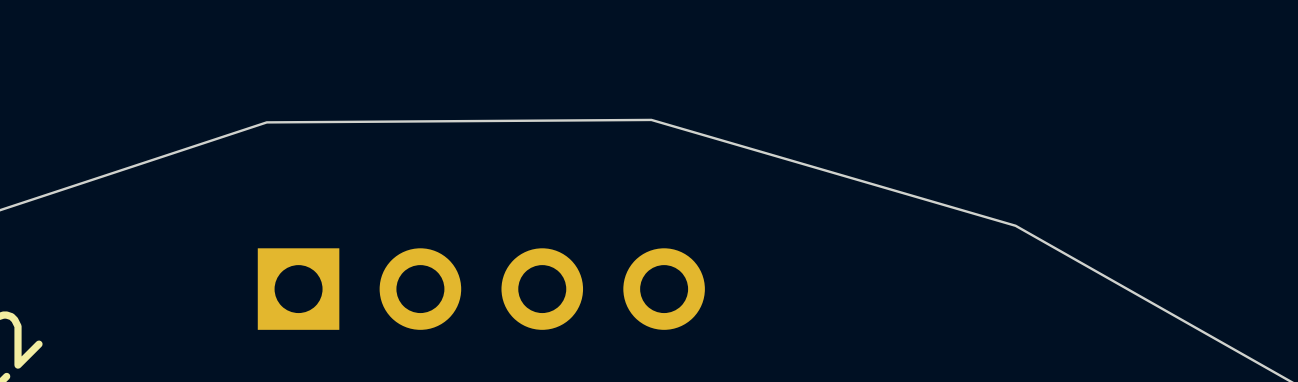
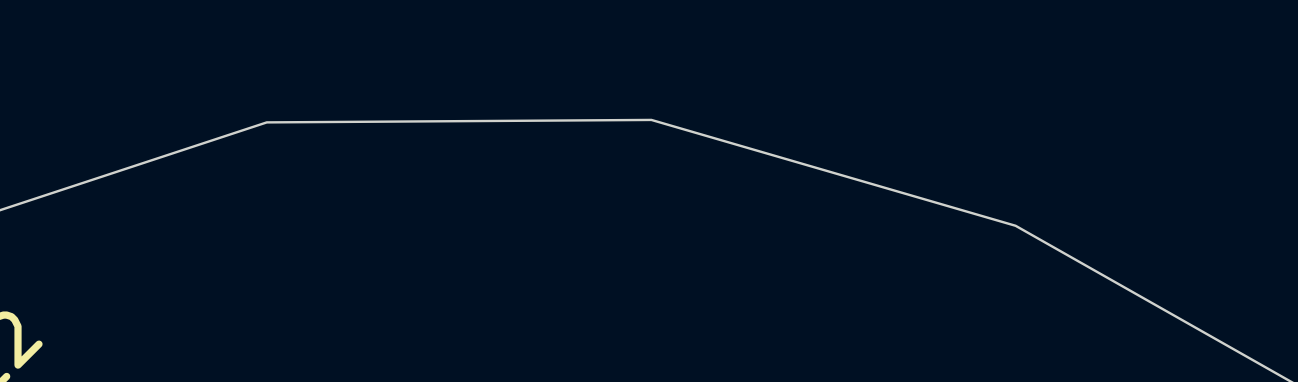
part: (481, 289) -> none

